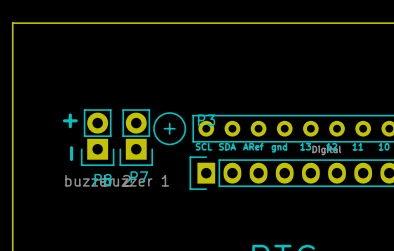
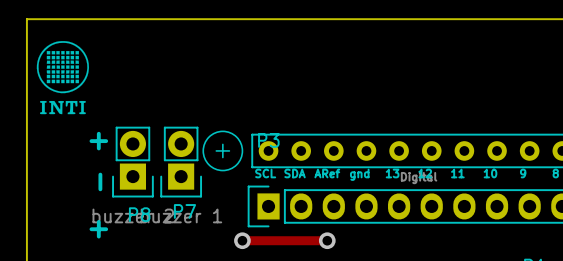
drawing: none -> [36, 41, 90, 115]
text: none -> + (98, 229)
track: none -> (242, 240) (327, 240)
via: none -> (242, 240)
via: none -> (327, 240)

